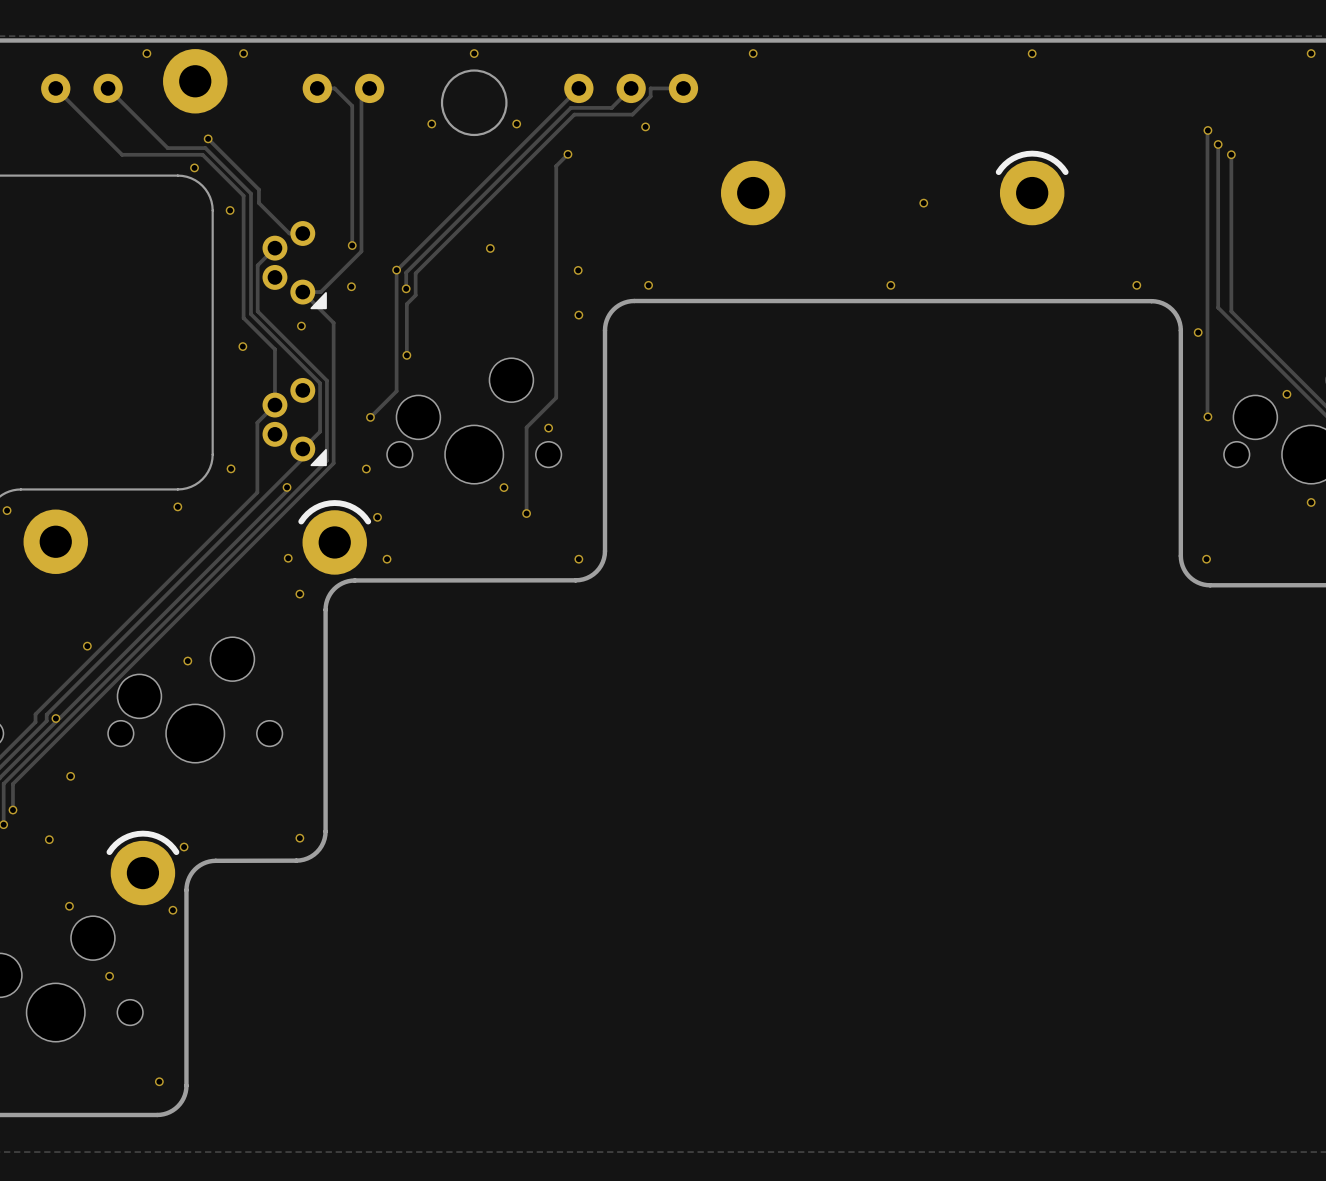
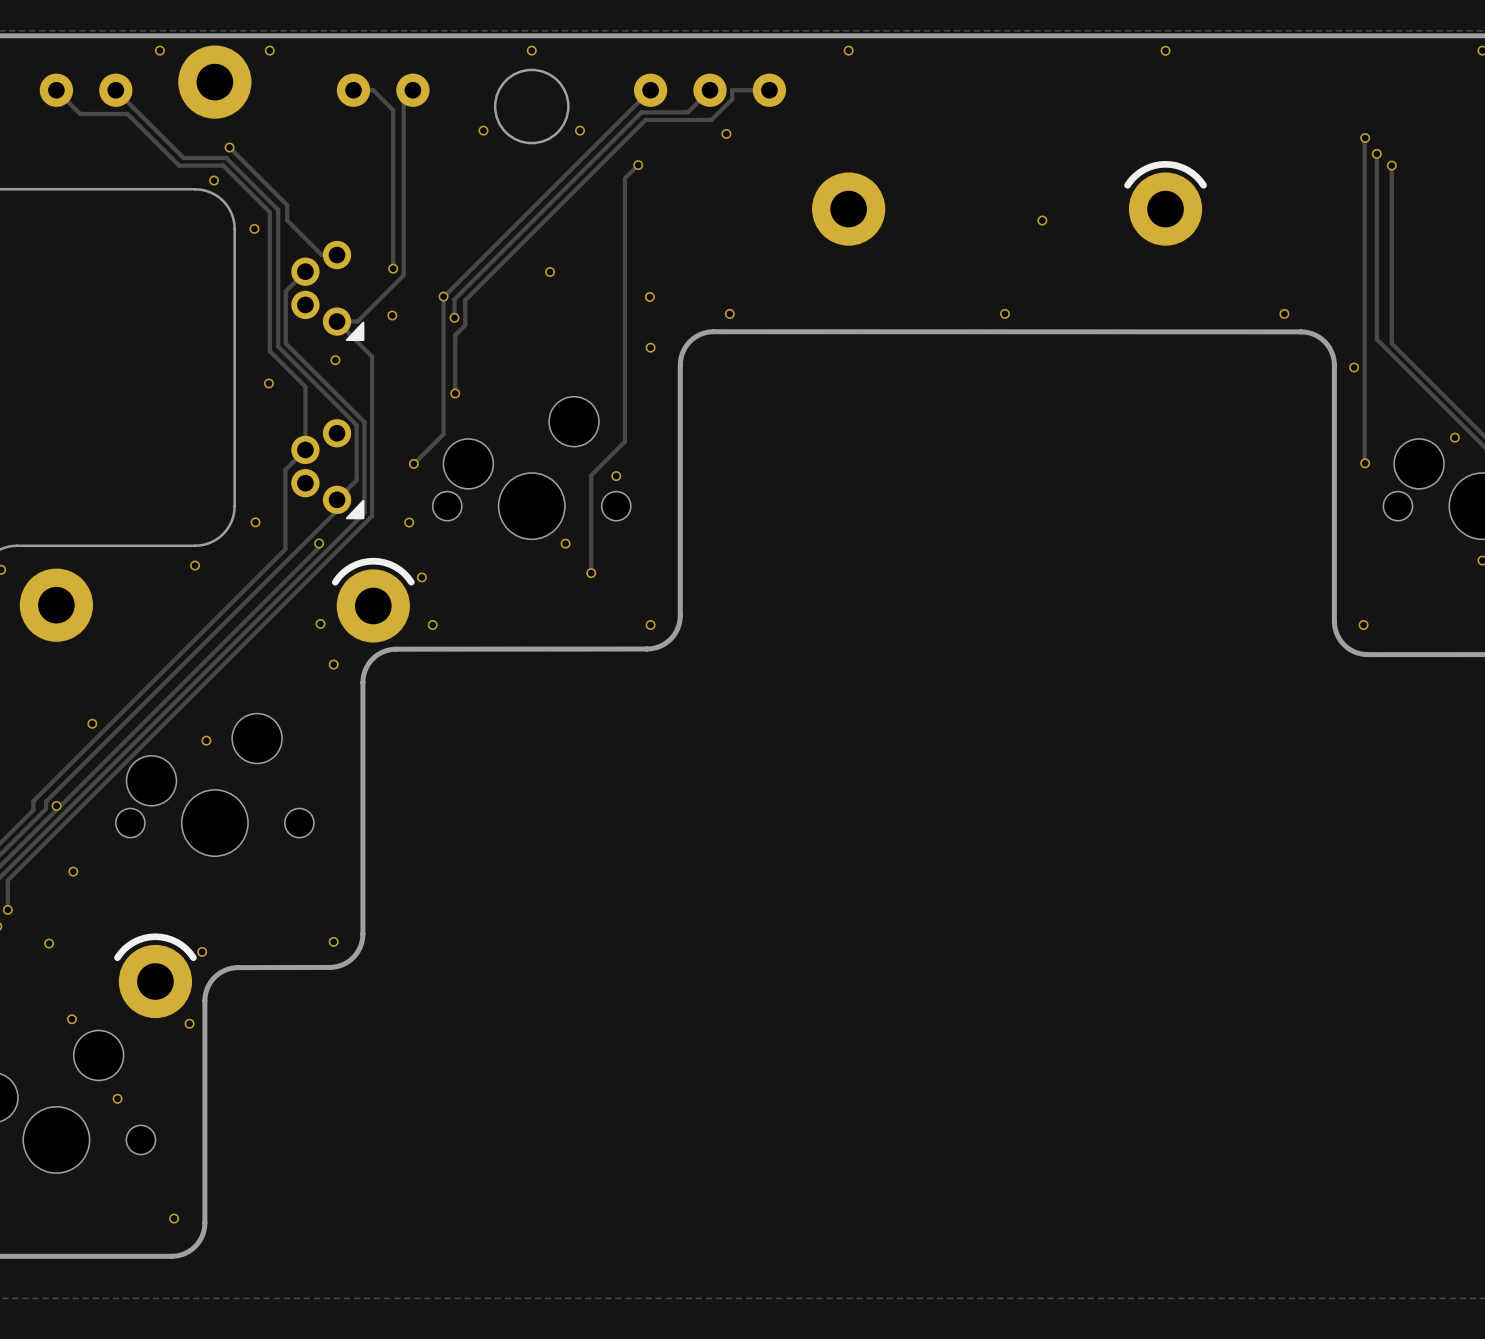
track: (76, 109) (122, 154) (163, 154) -> (80, 113) (127, 113) (179, 165)

